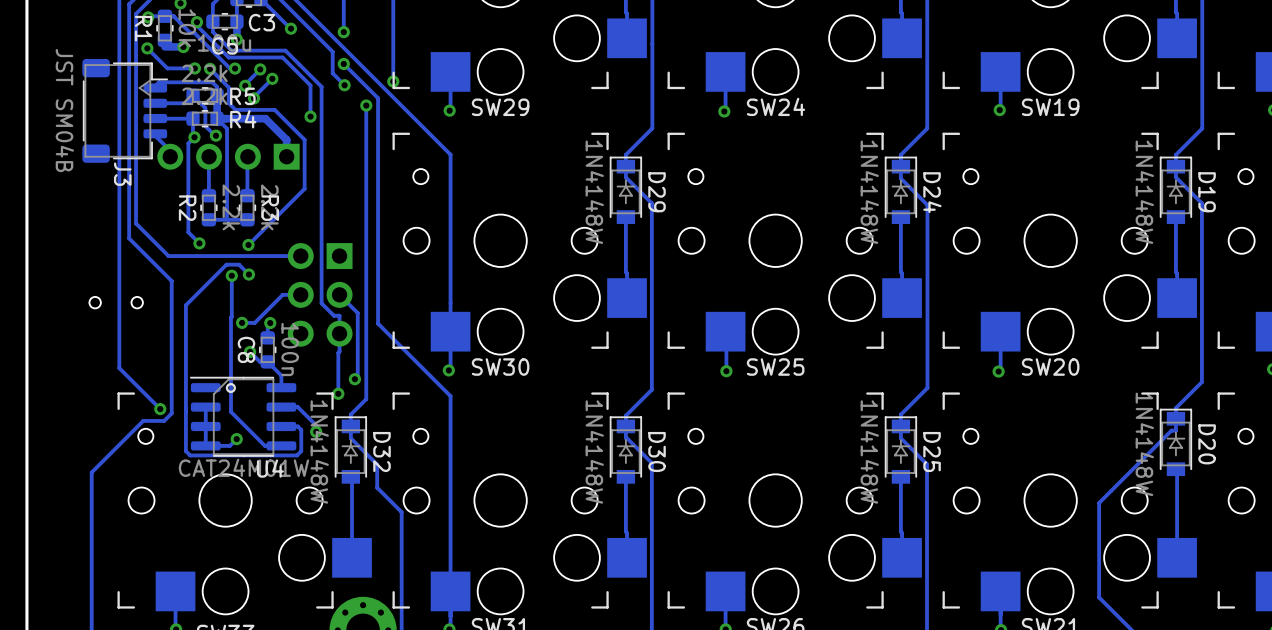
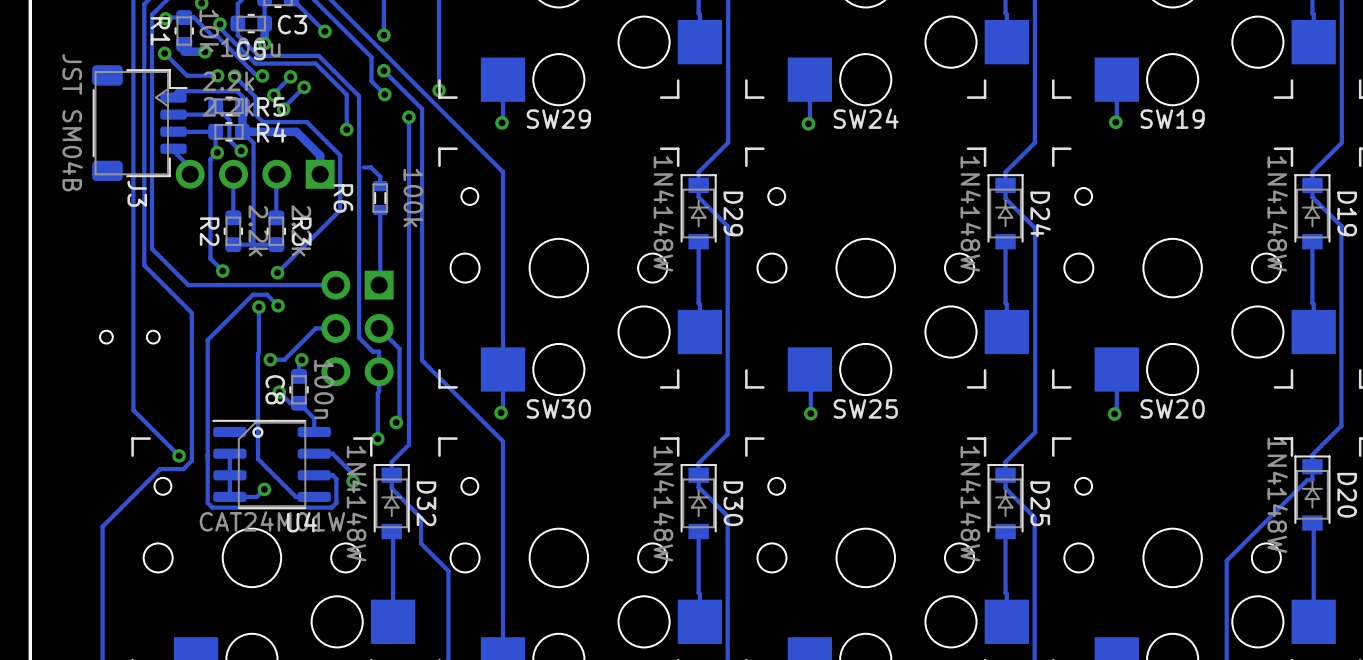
track: none -> (363, 167) (370, 167) (380, 176) (380, 186)
R6: none -> 100k (380, 198)
track: none -> (380, 209) (379, 285)

